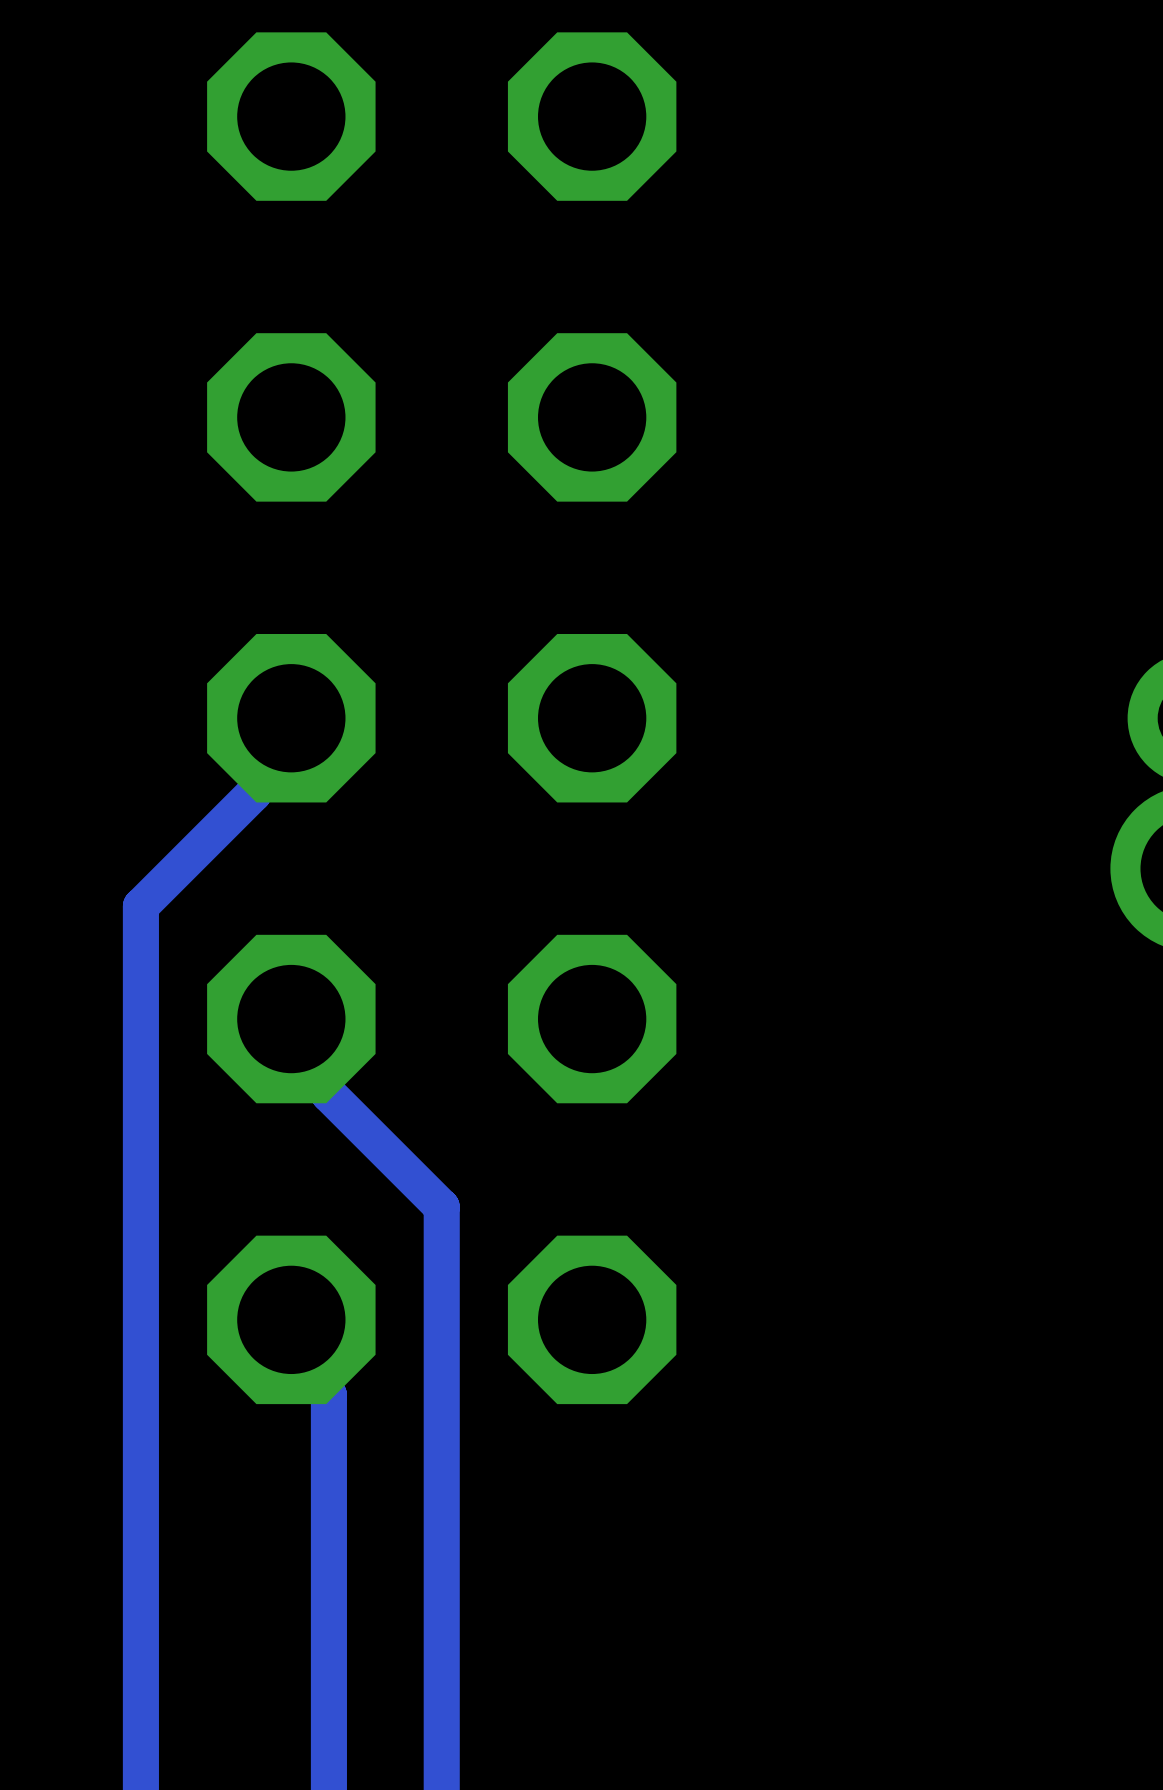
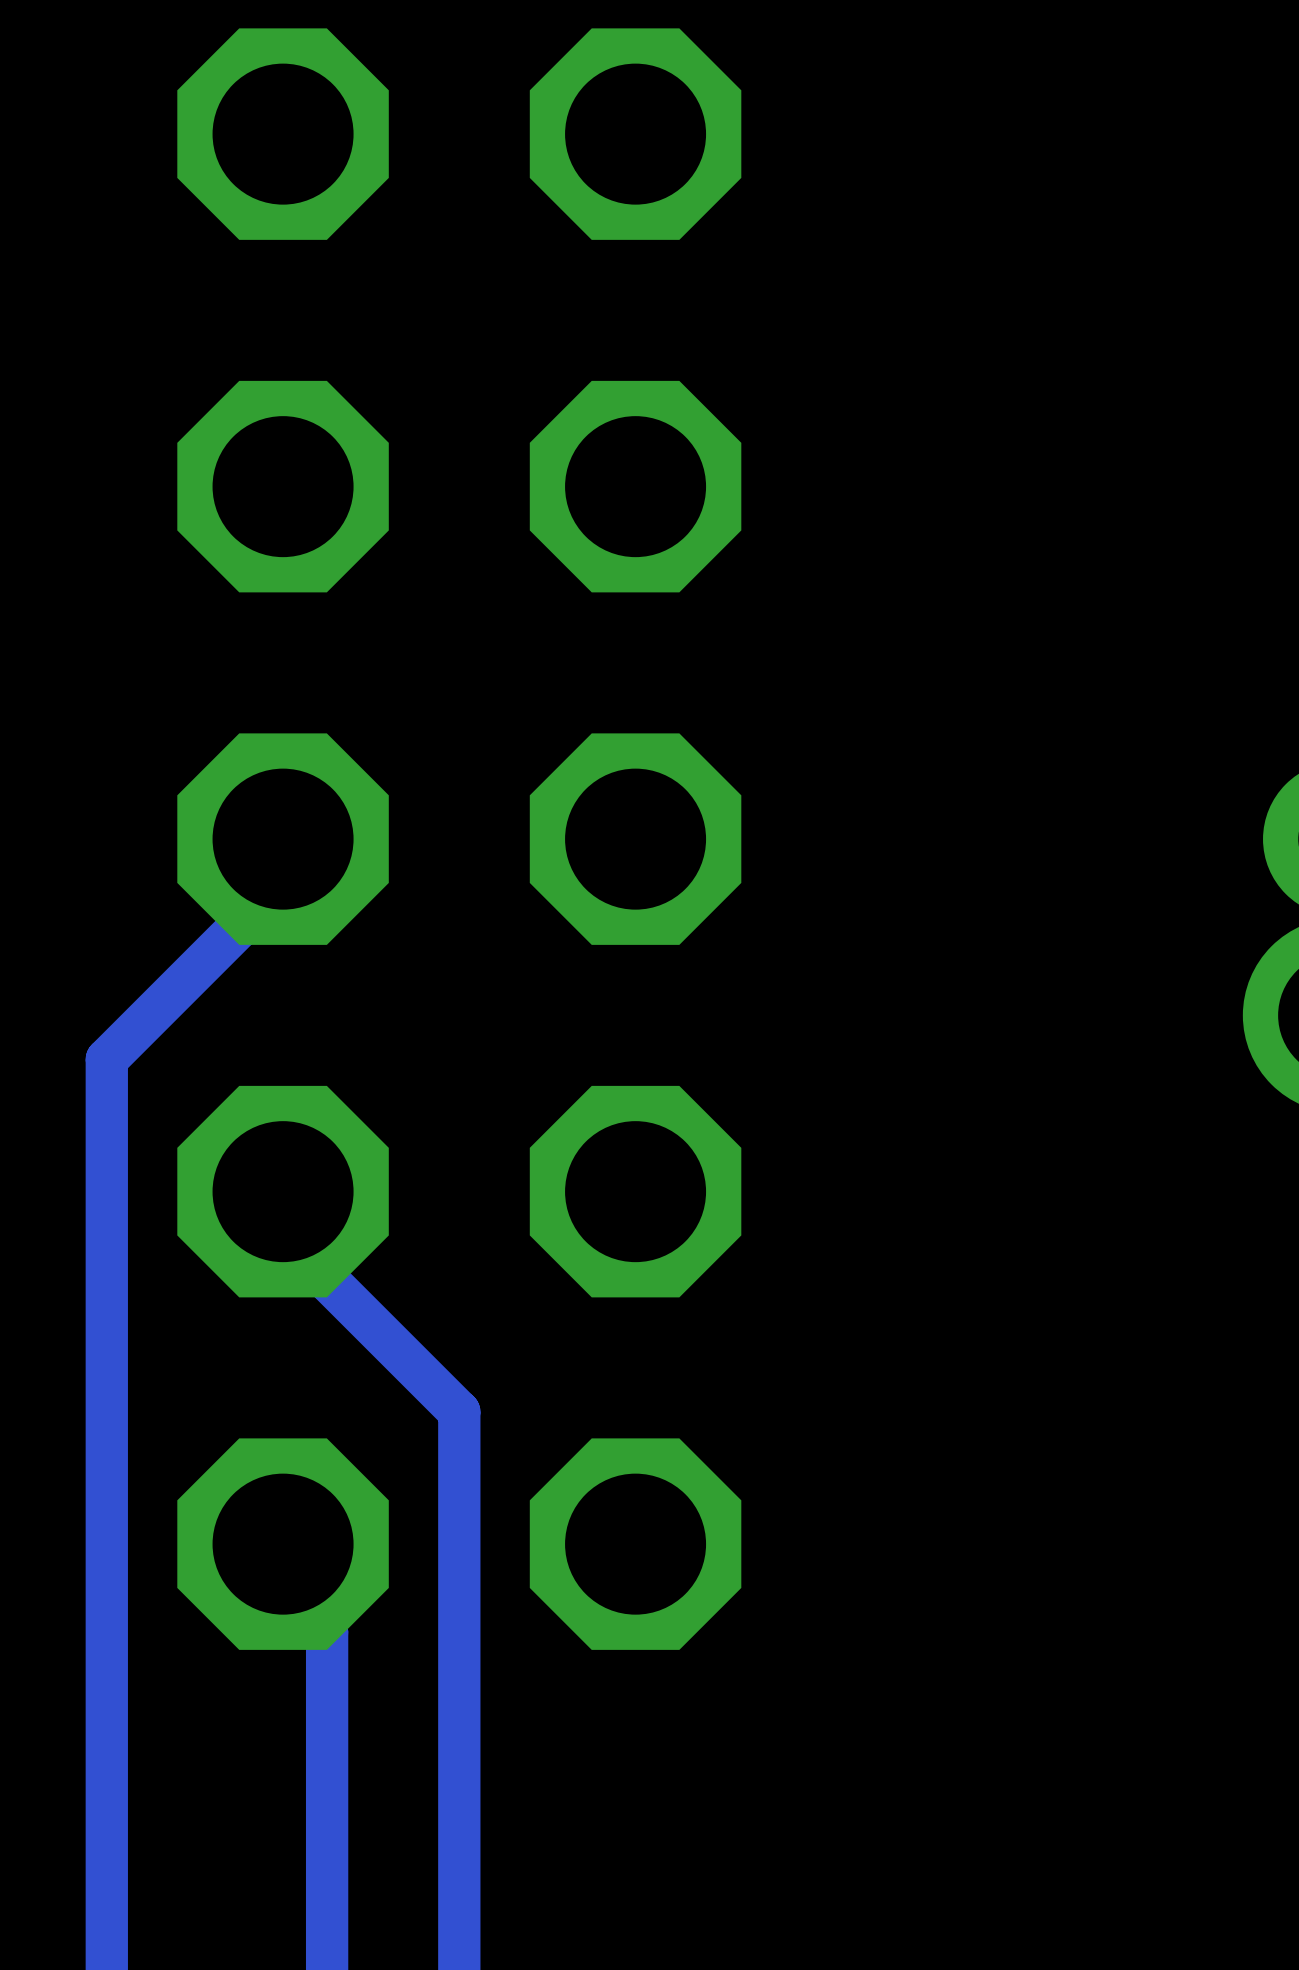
part footprint: [207, 32, 677, 1405] -> [177, 28, 742, 1650]

